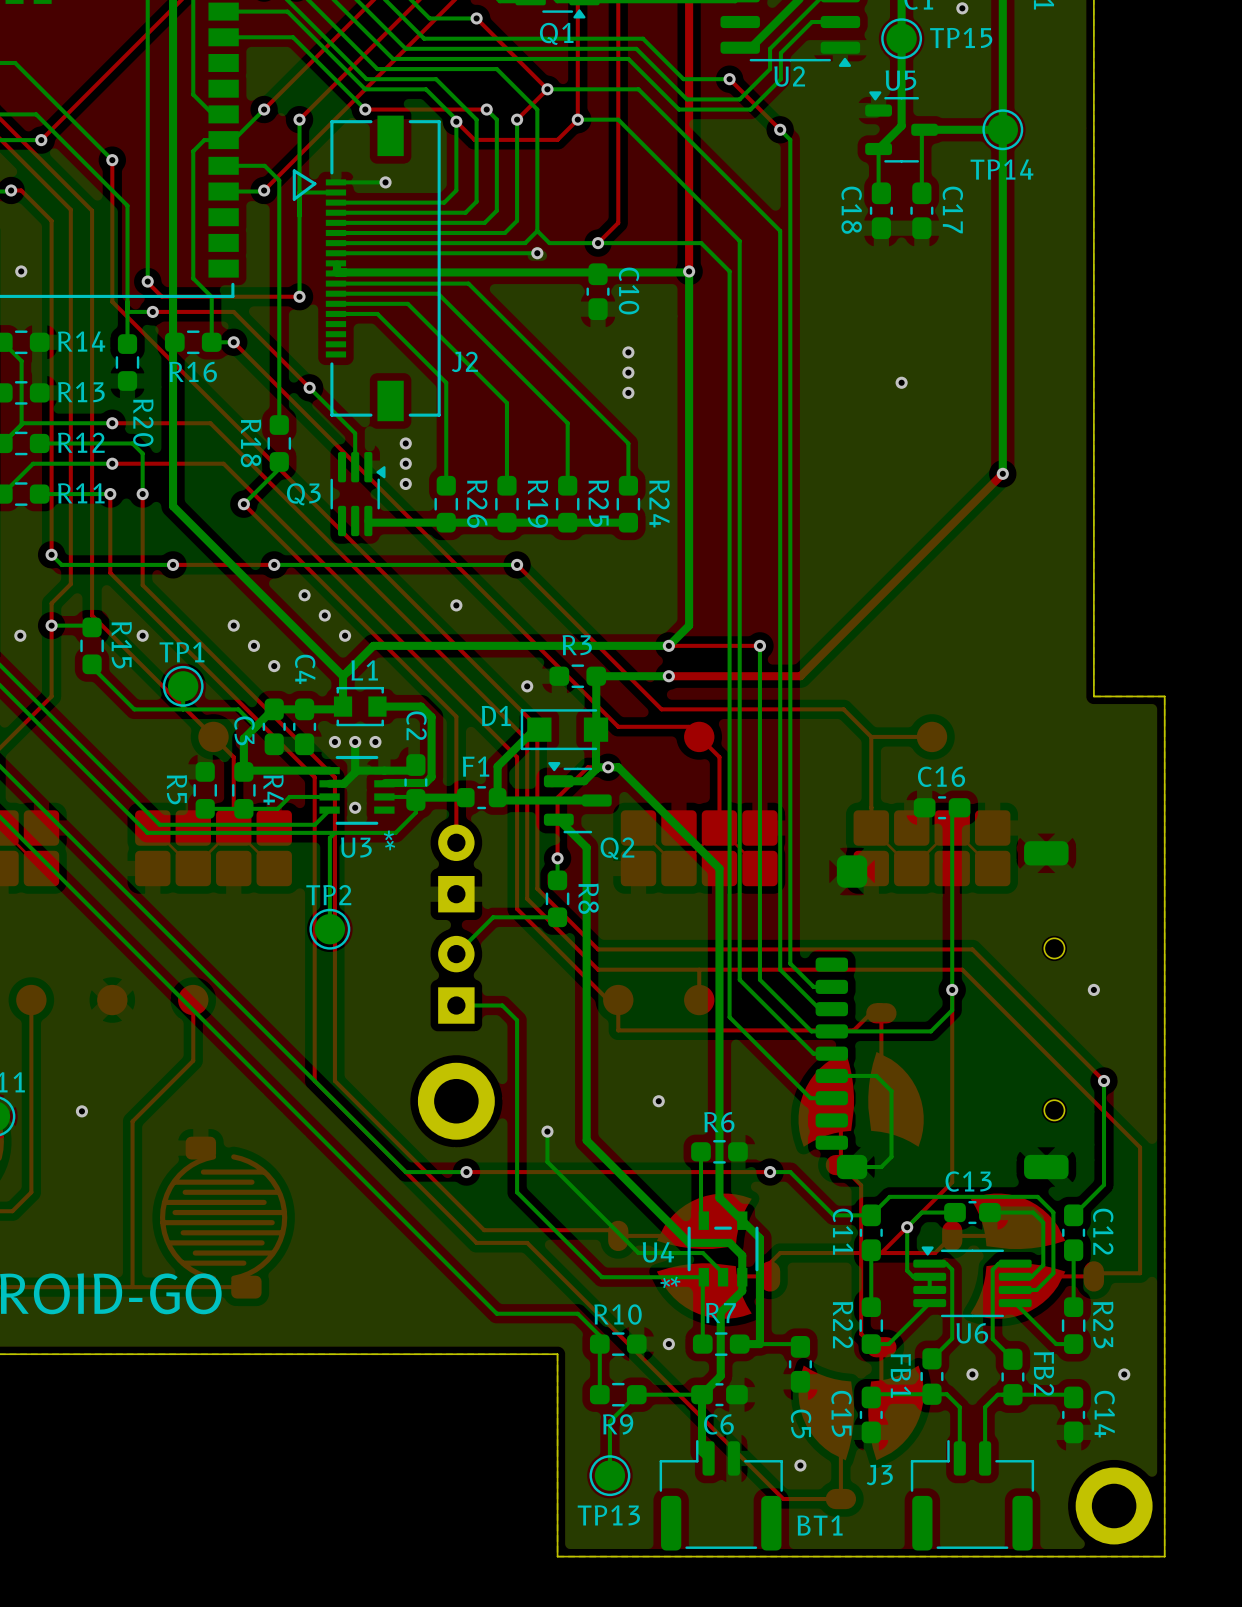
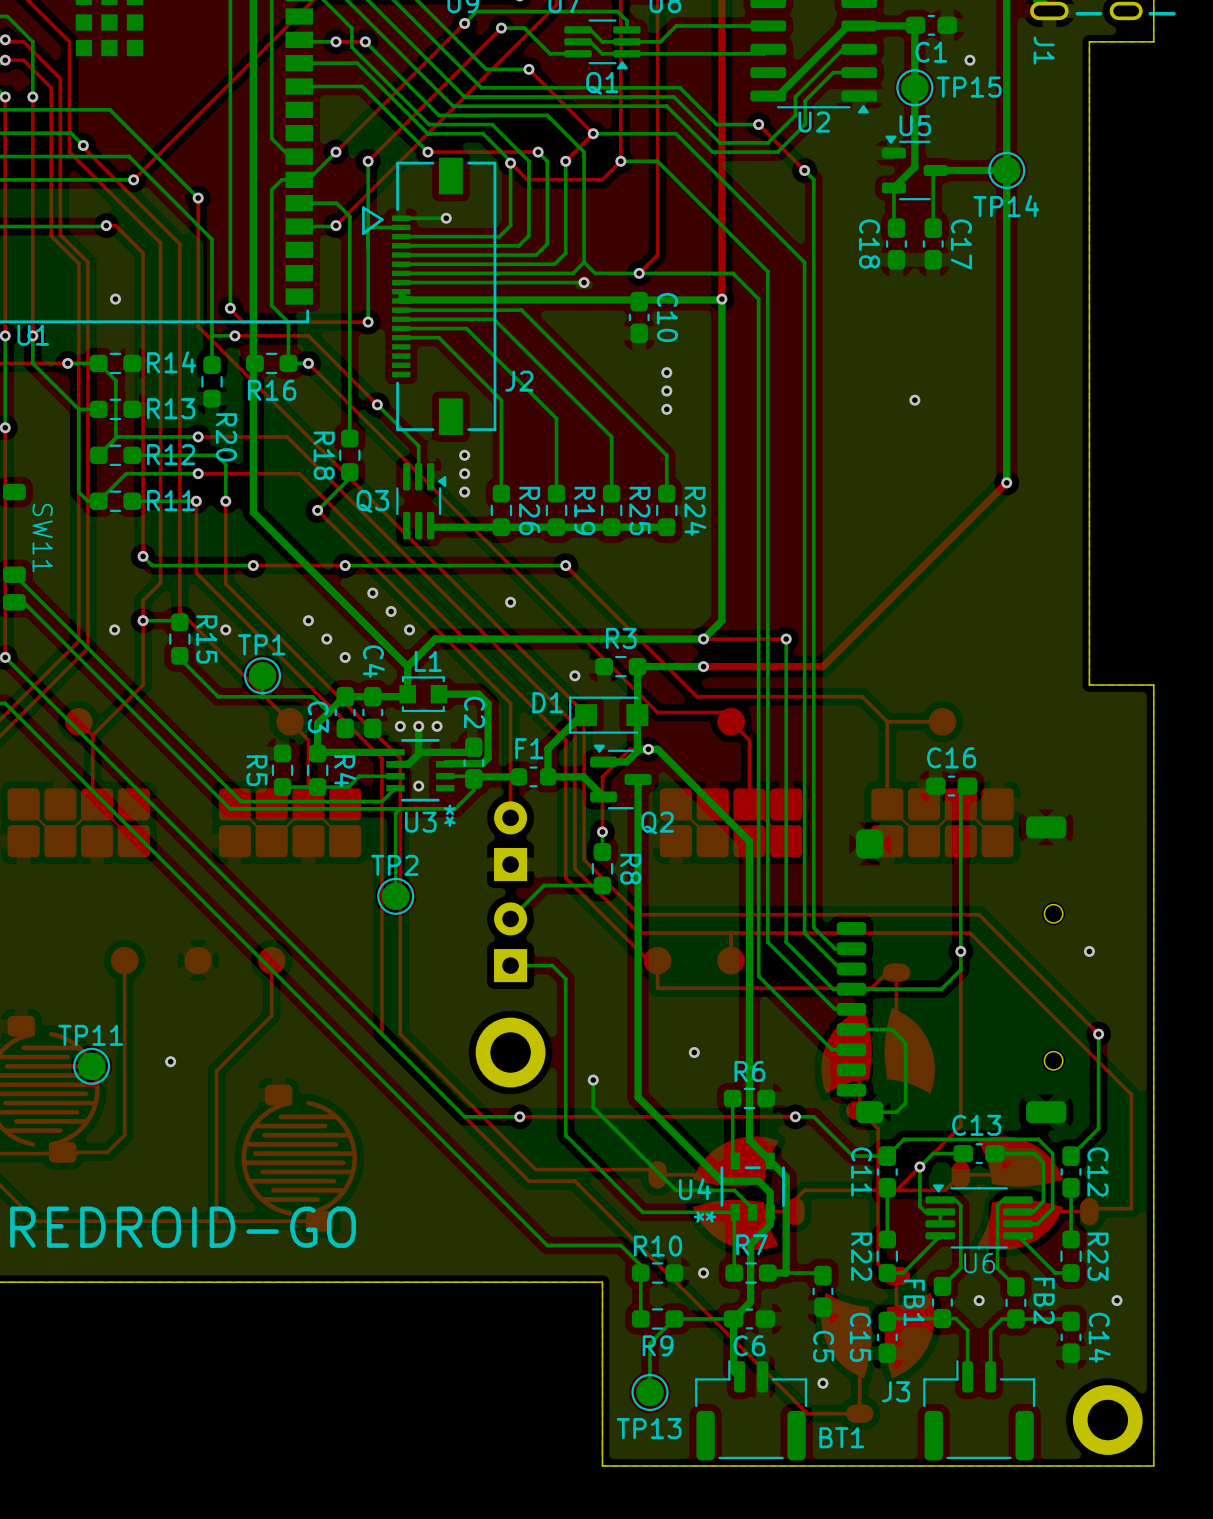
bottom track: none -> (548, 776) (583, 776) (603, 796)
bottom track: (596, 800) (506, 800) -> none
bottom track: (558, 819) (586, 847) (586, 1140) (596, 1150) -> (638, 779) (638, 1097)

